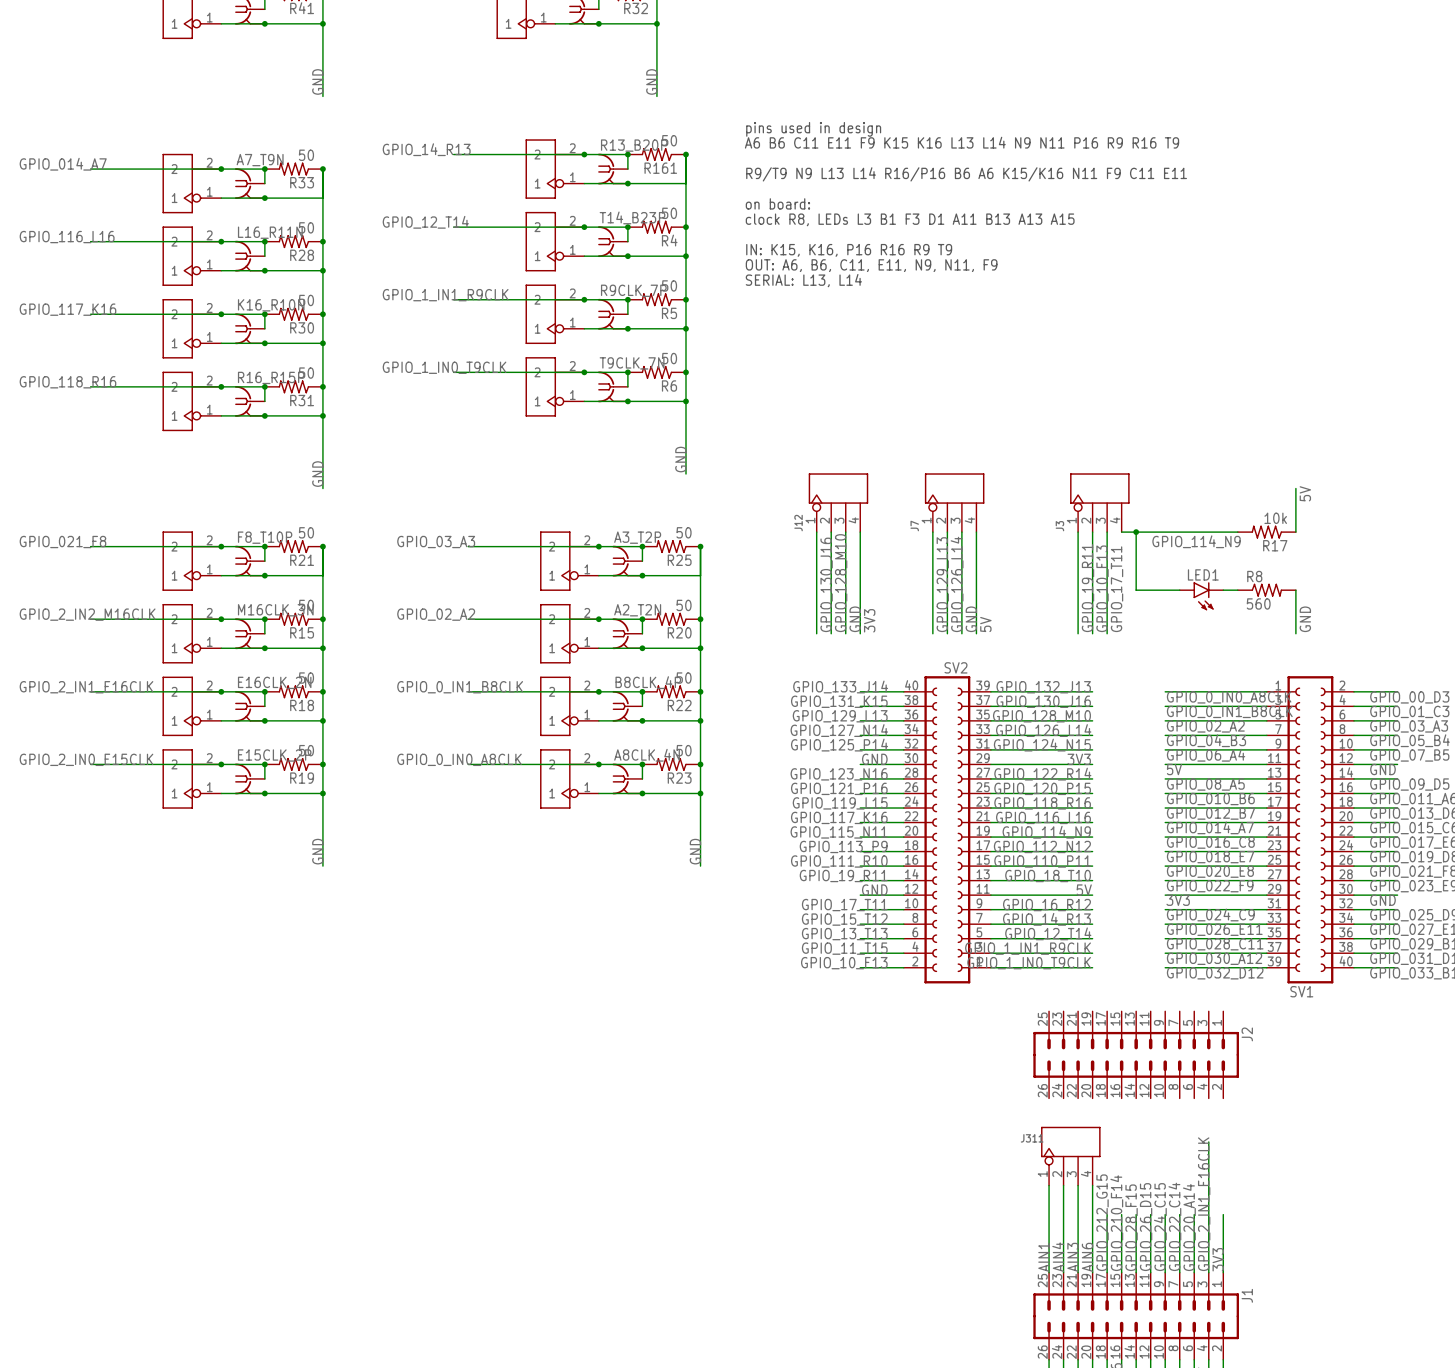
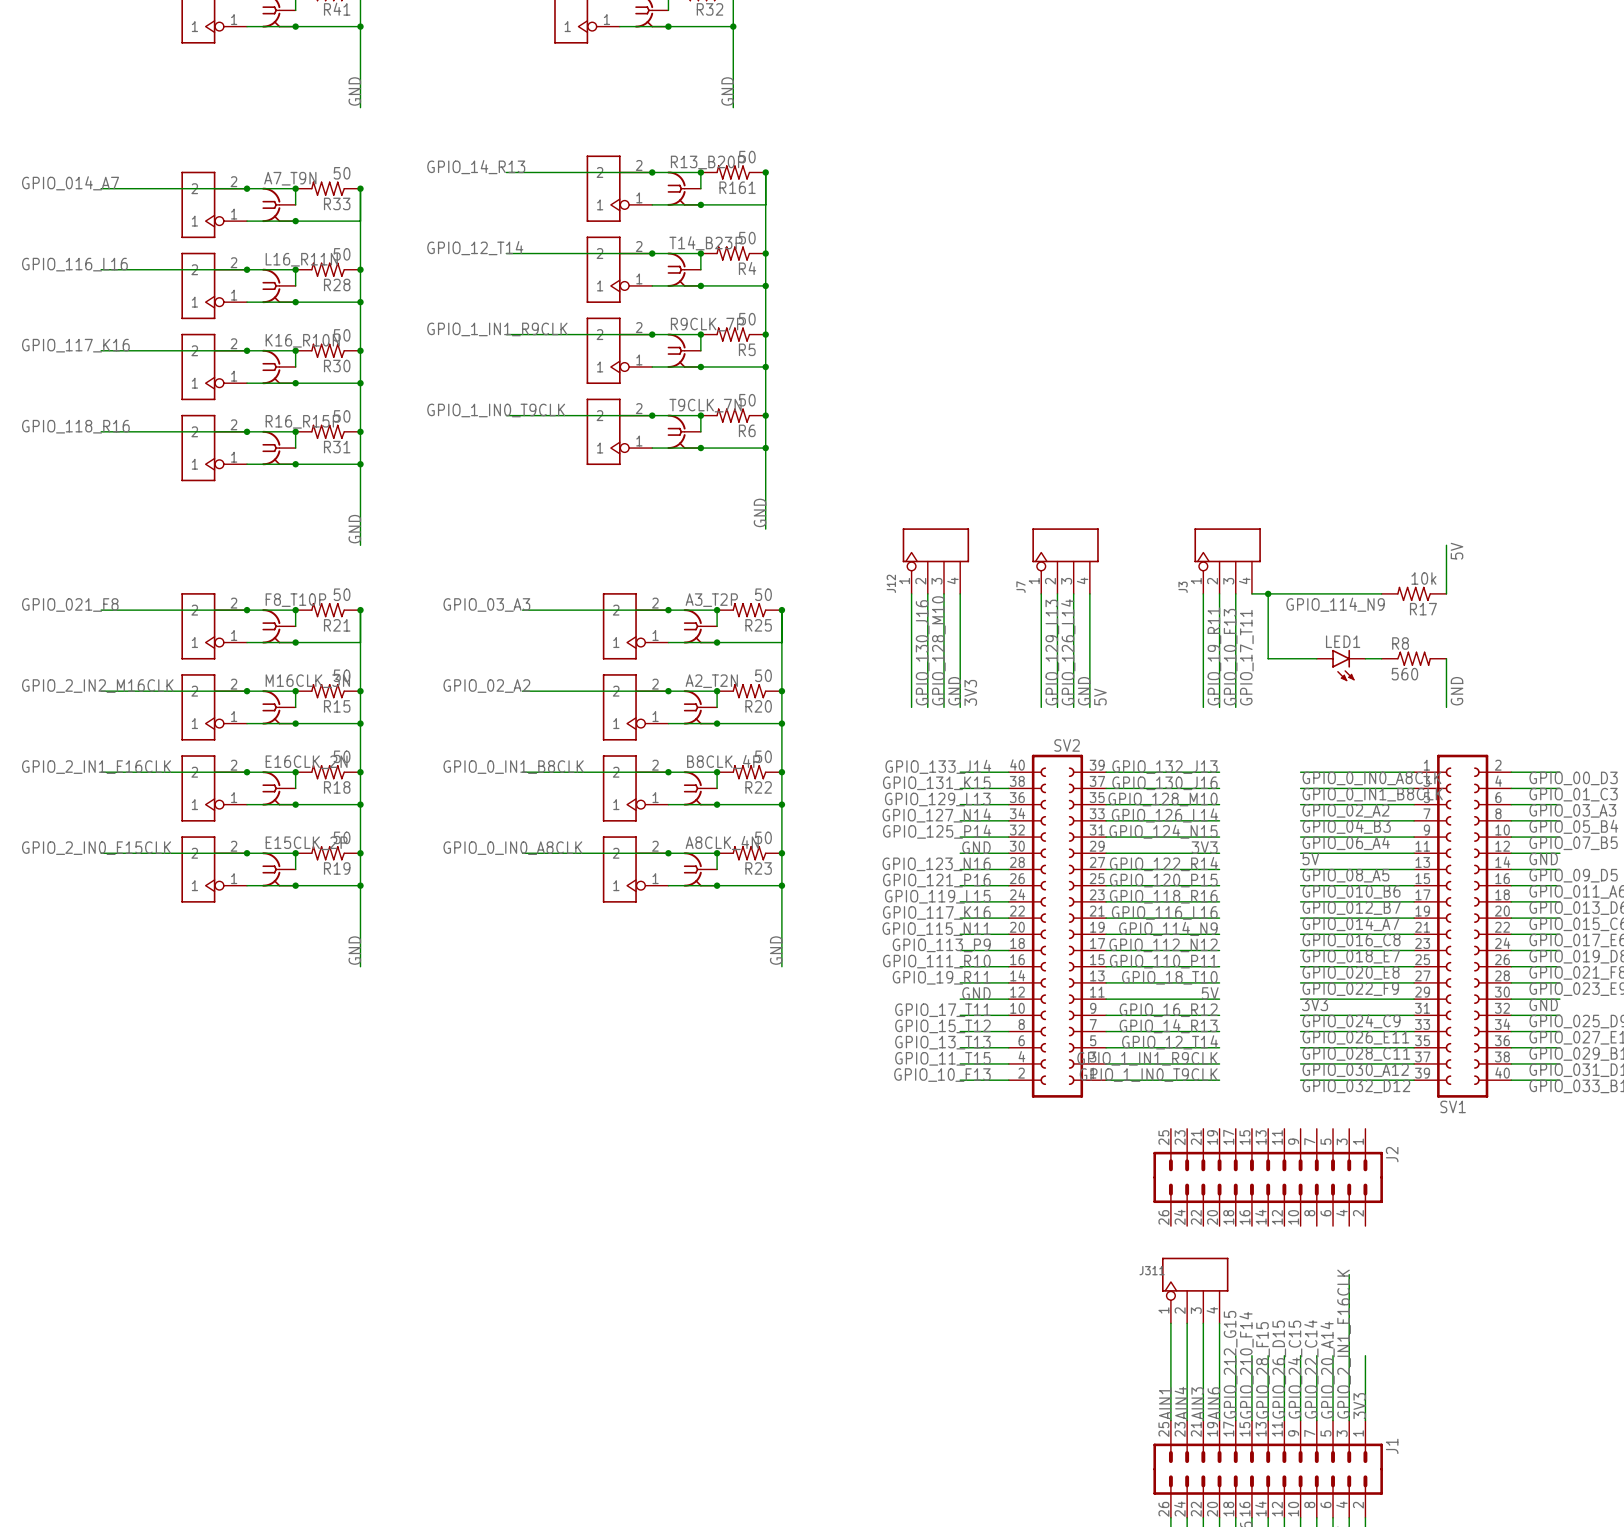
text: pins used in design (813, 129) -> none
text: A6 B6 C11 E11 F9 K15 K16 L13 L14 N9 N11 P16 R9 R16 T9 (962, 142) -> none
text: R9/T9 N9 L13 L14 R16/P16 B6 A6 K15/K16 N11 F9 C11 E11 (966, 174) -> none
text: on board: (777, 203) -> none
text: clock R8, LEDs L3 B1 F3 D1 A11 B13 A13 A15 (910, 219) -> none
text: IN: K15, K16, P16 R16 R9 T9 (849, 250) -> none
text: OUT: A6, B6, C11, E11, N9, N11, F9 (871, 265) -> none
text: SERIAL: L13, L14 (803, 280) -> none

